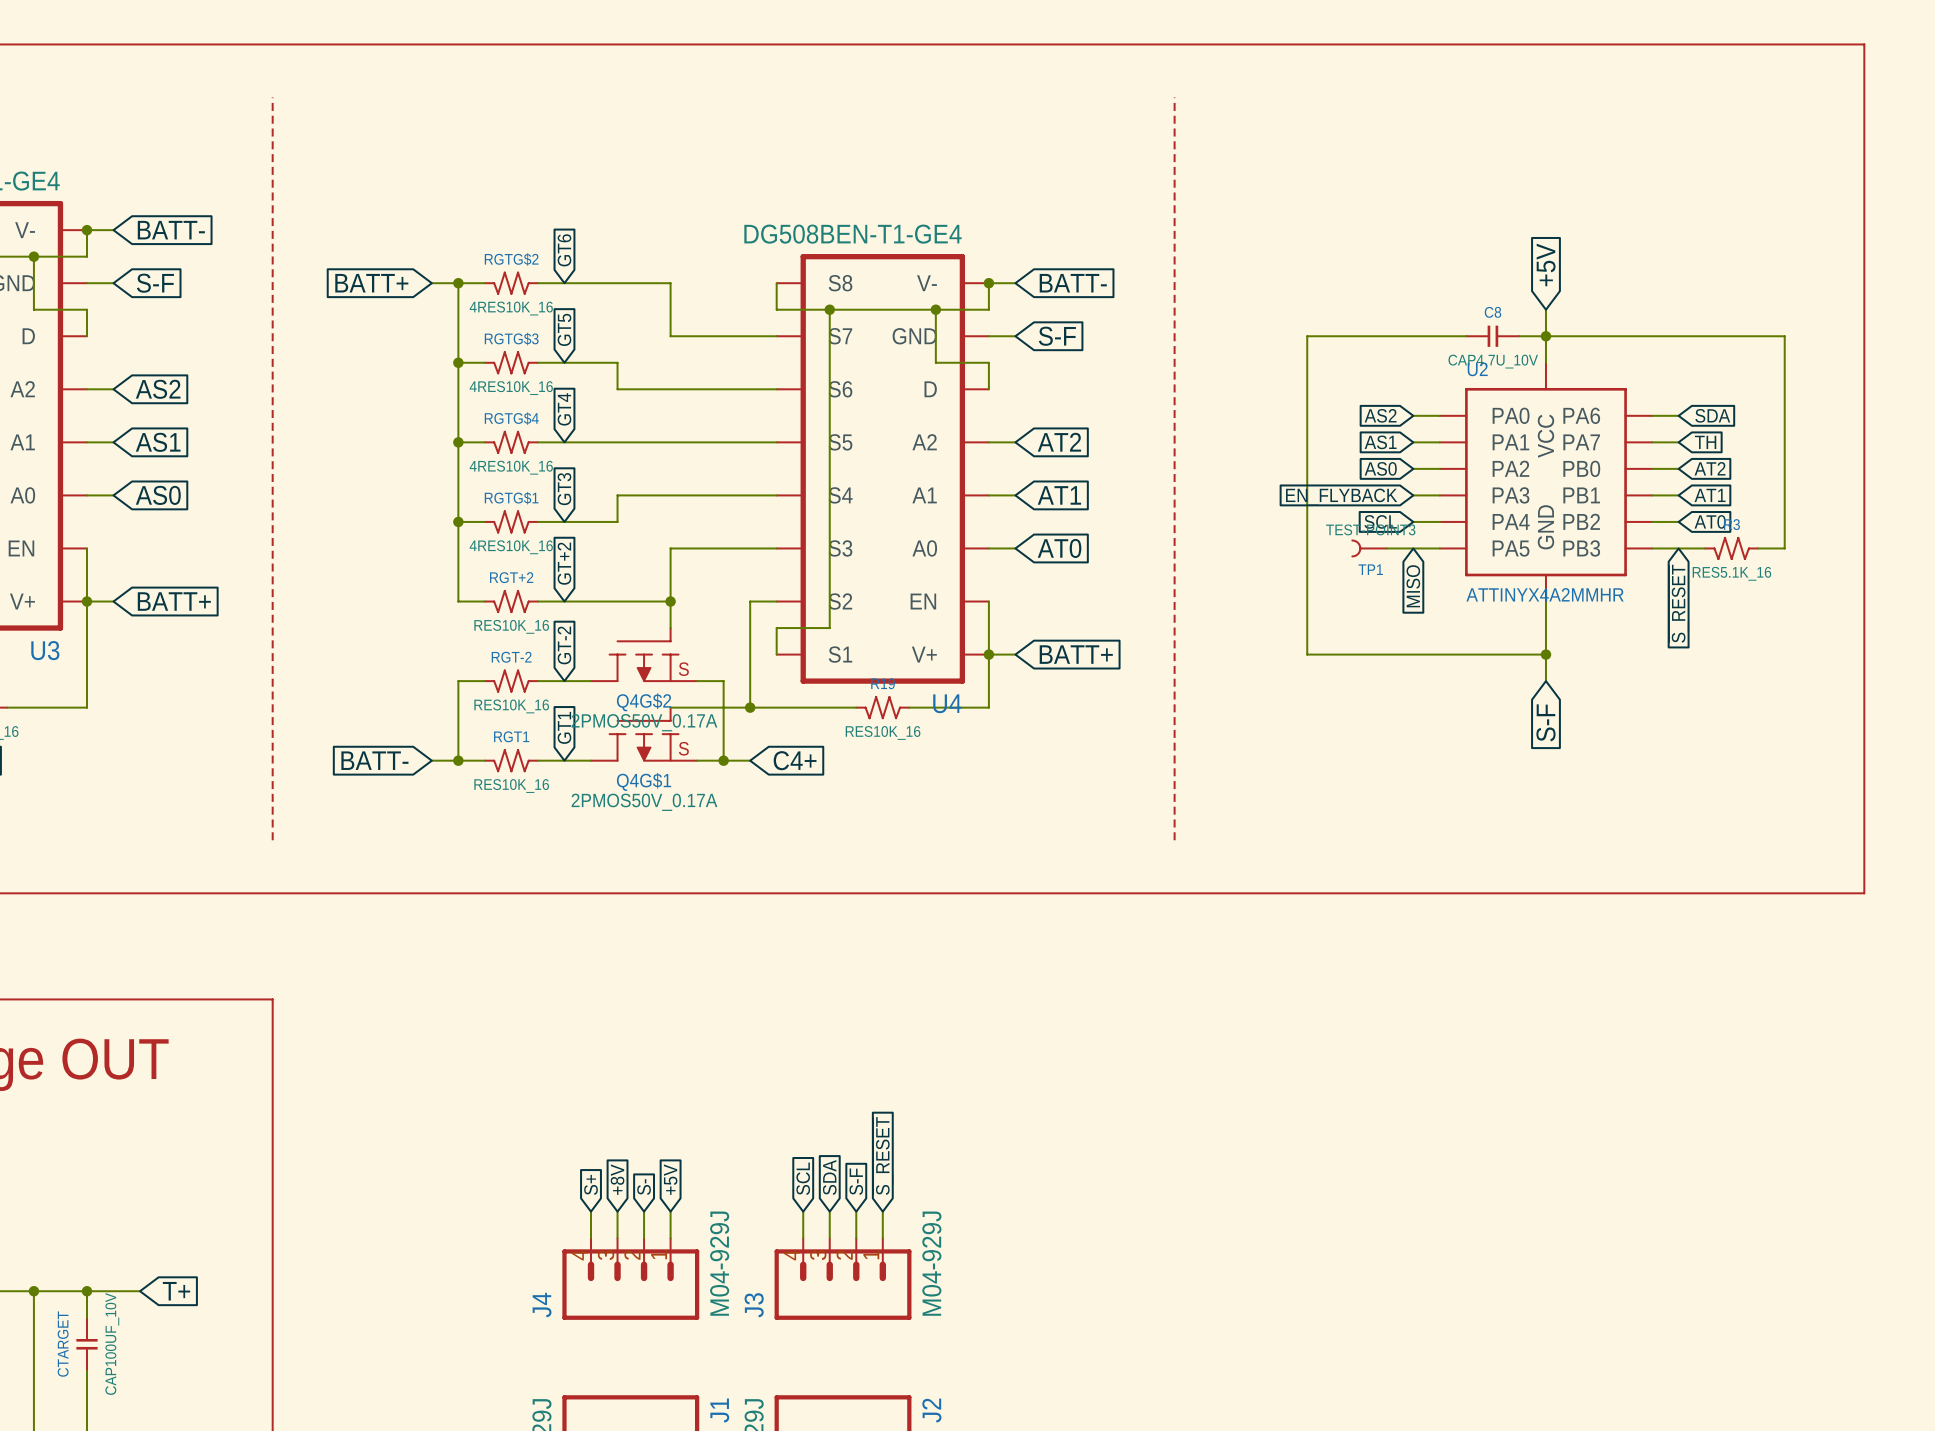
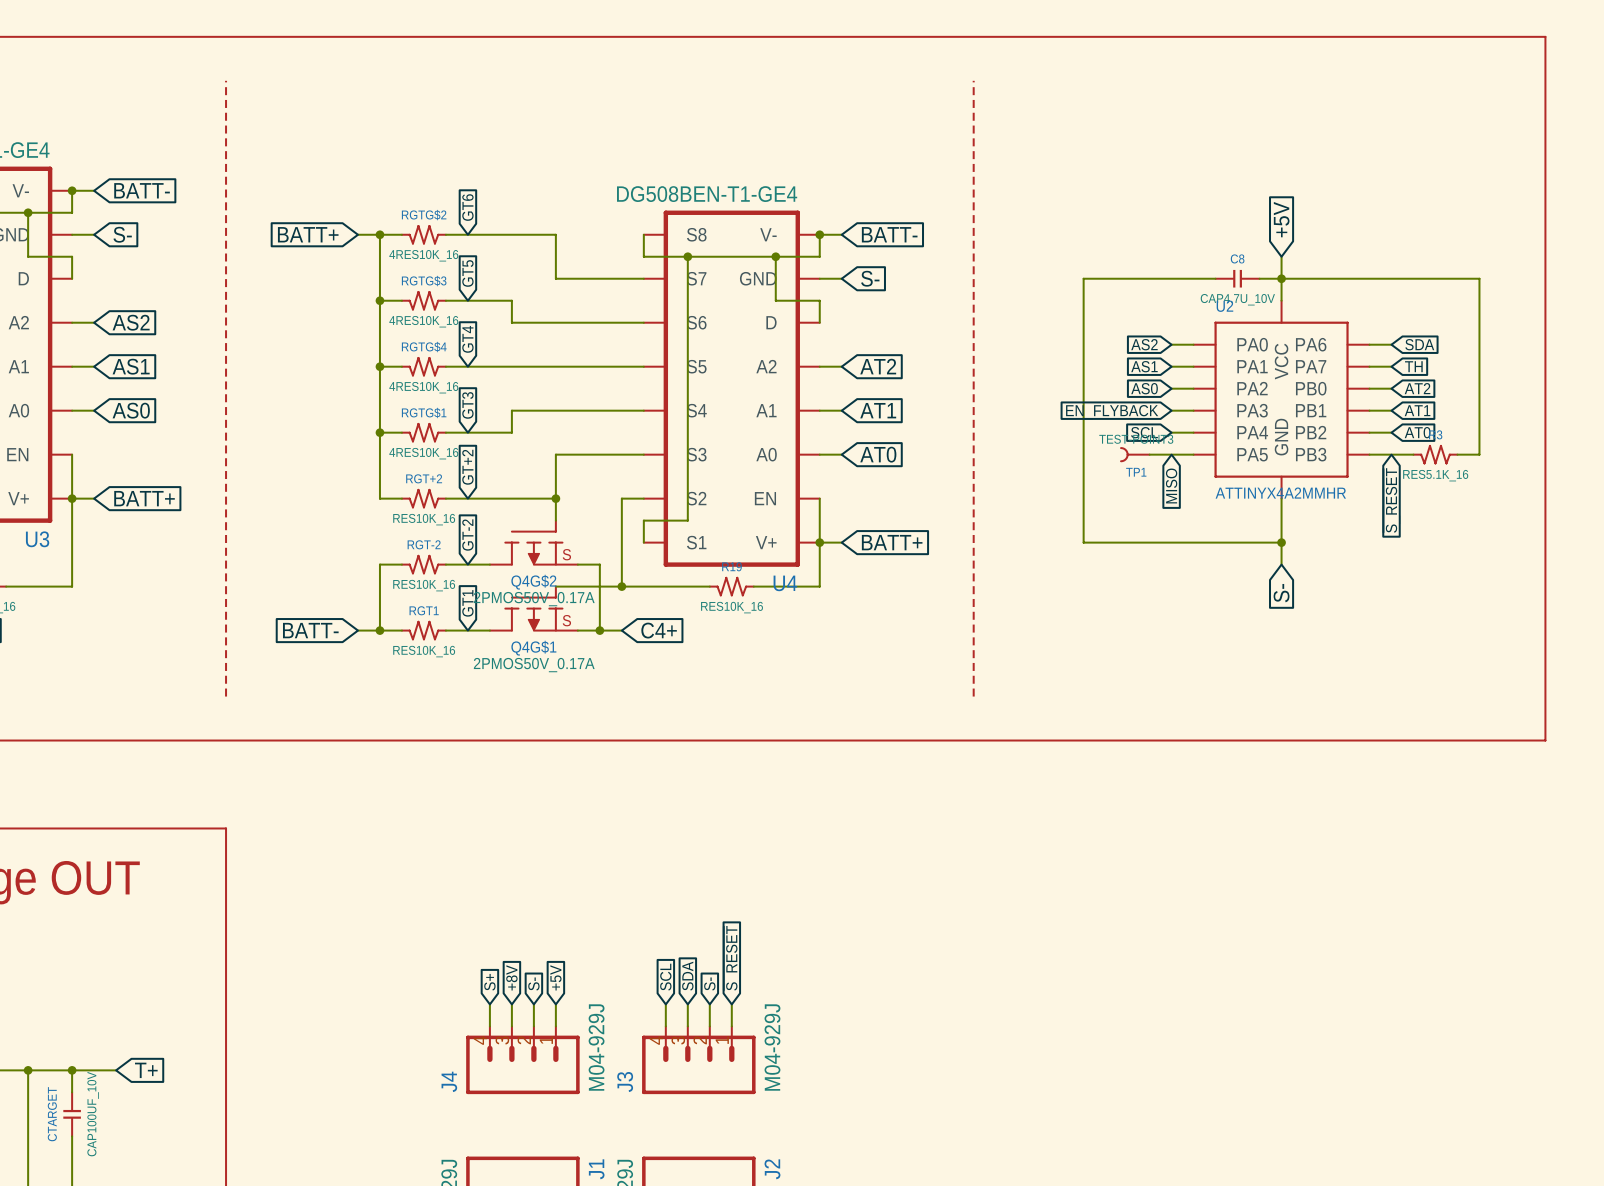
global label: S-F (155, 283) -> S- (122, 234)
global label: S-F (1057, 336) -> S- (870, 278)
global label: S-F (1545, 722) -> S- (1281, 593)
global label: S-F (856, 1181) -> S- (709, 984)

